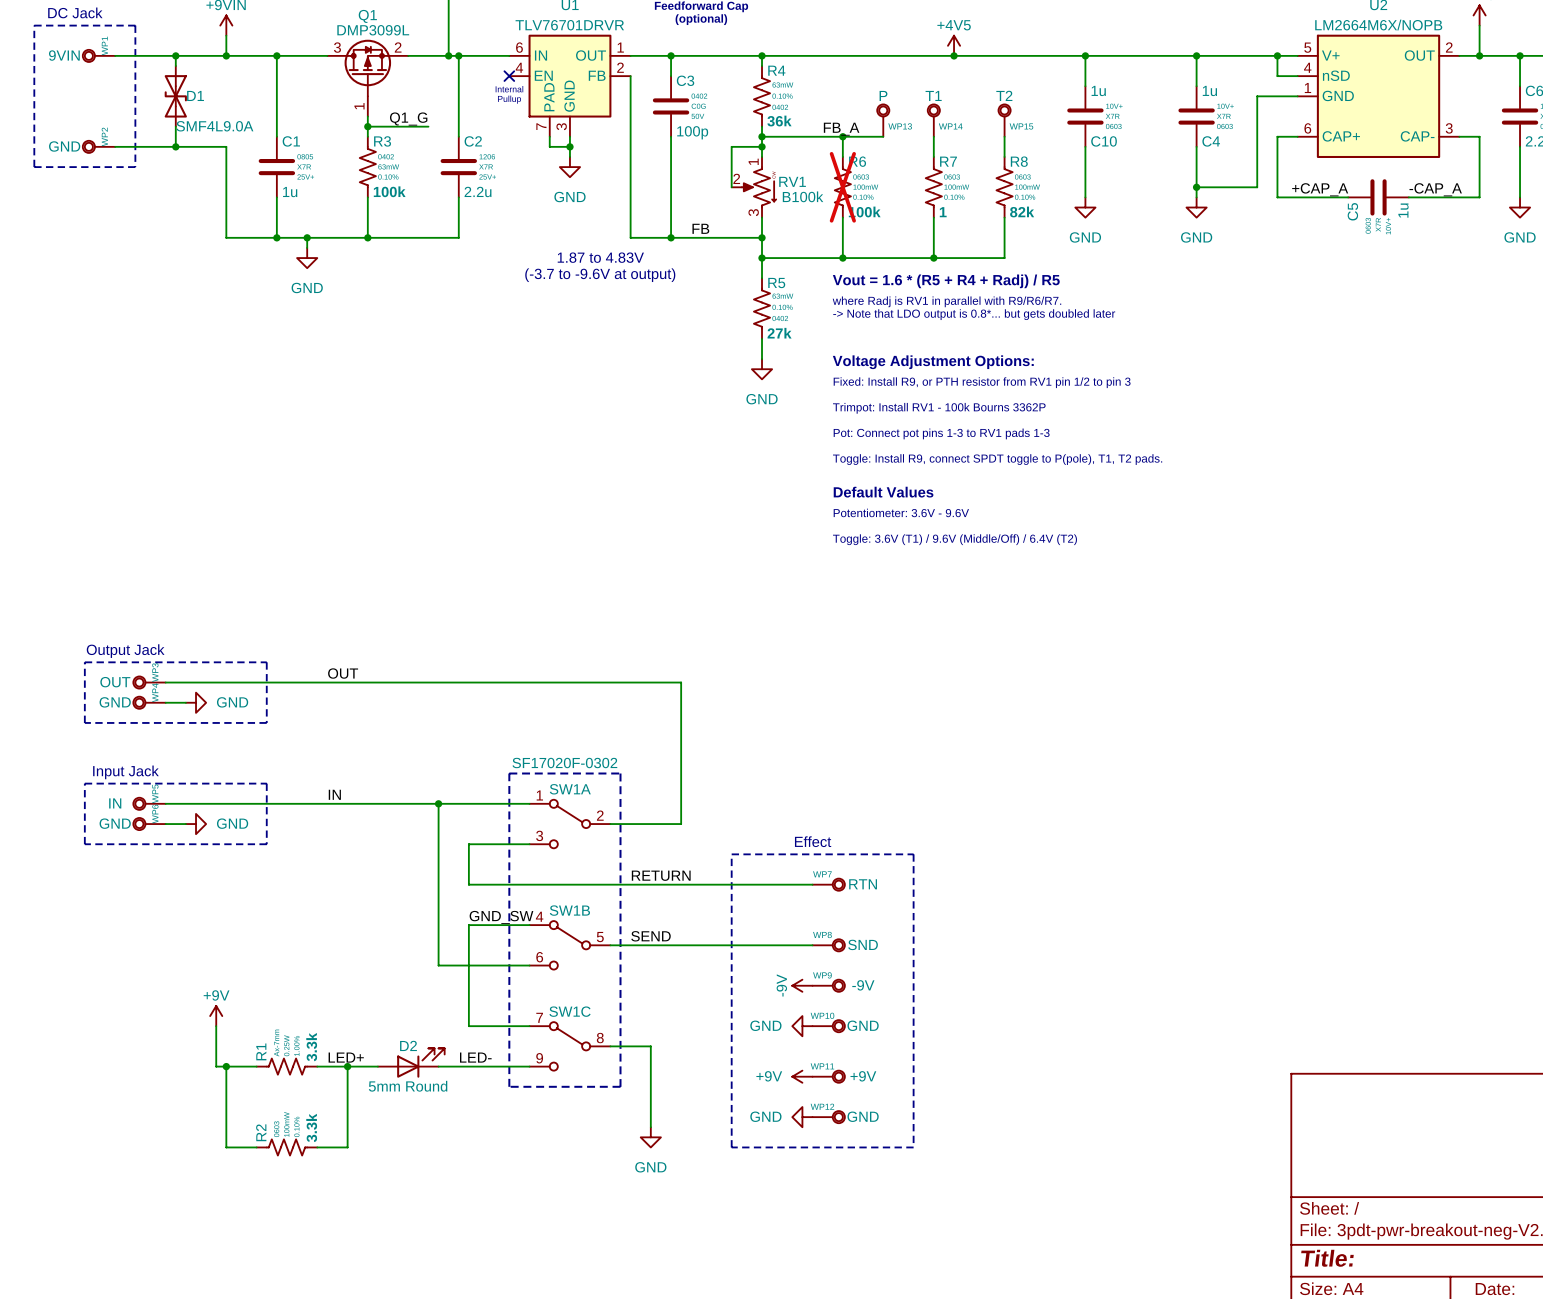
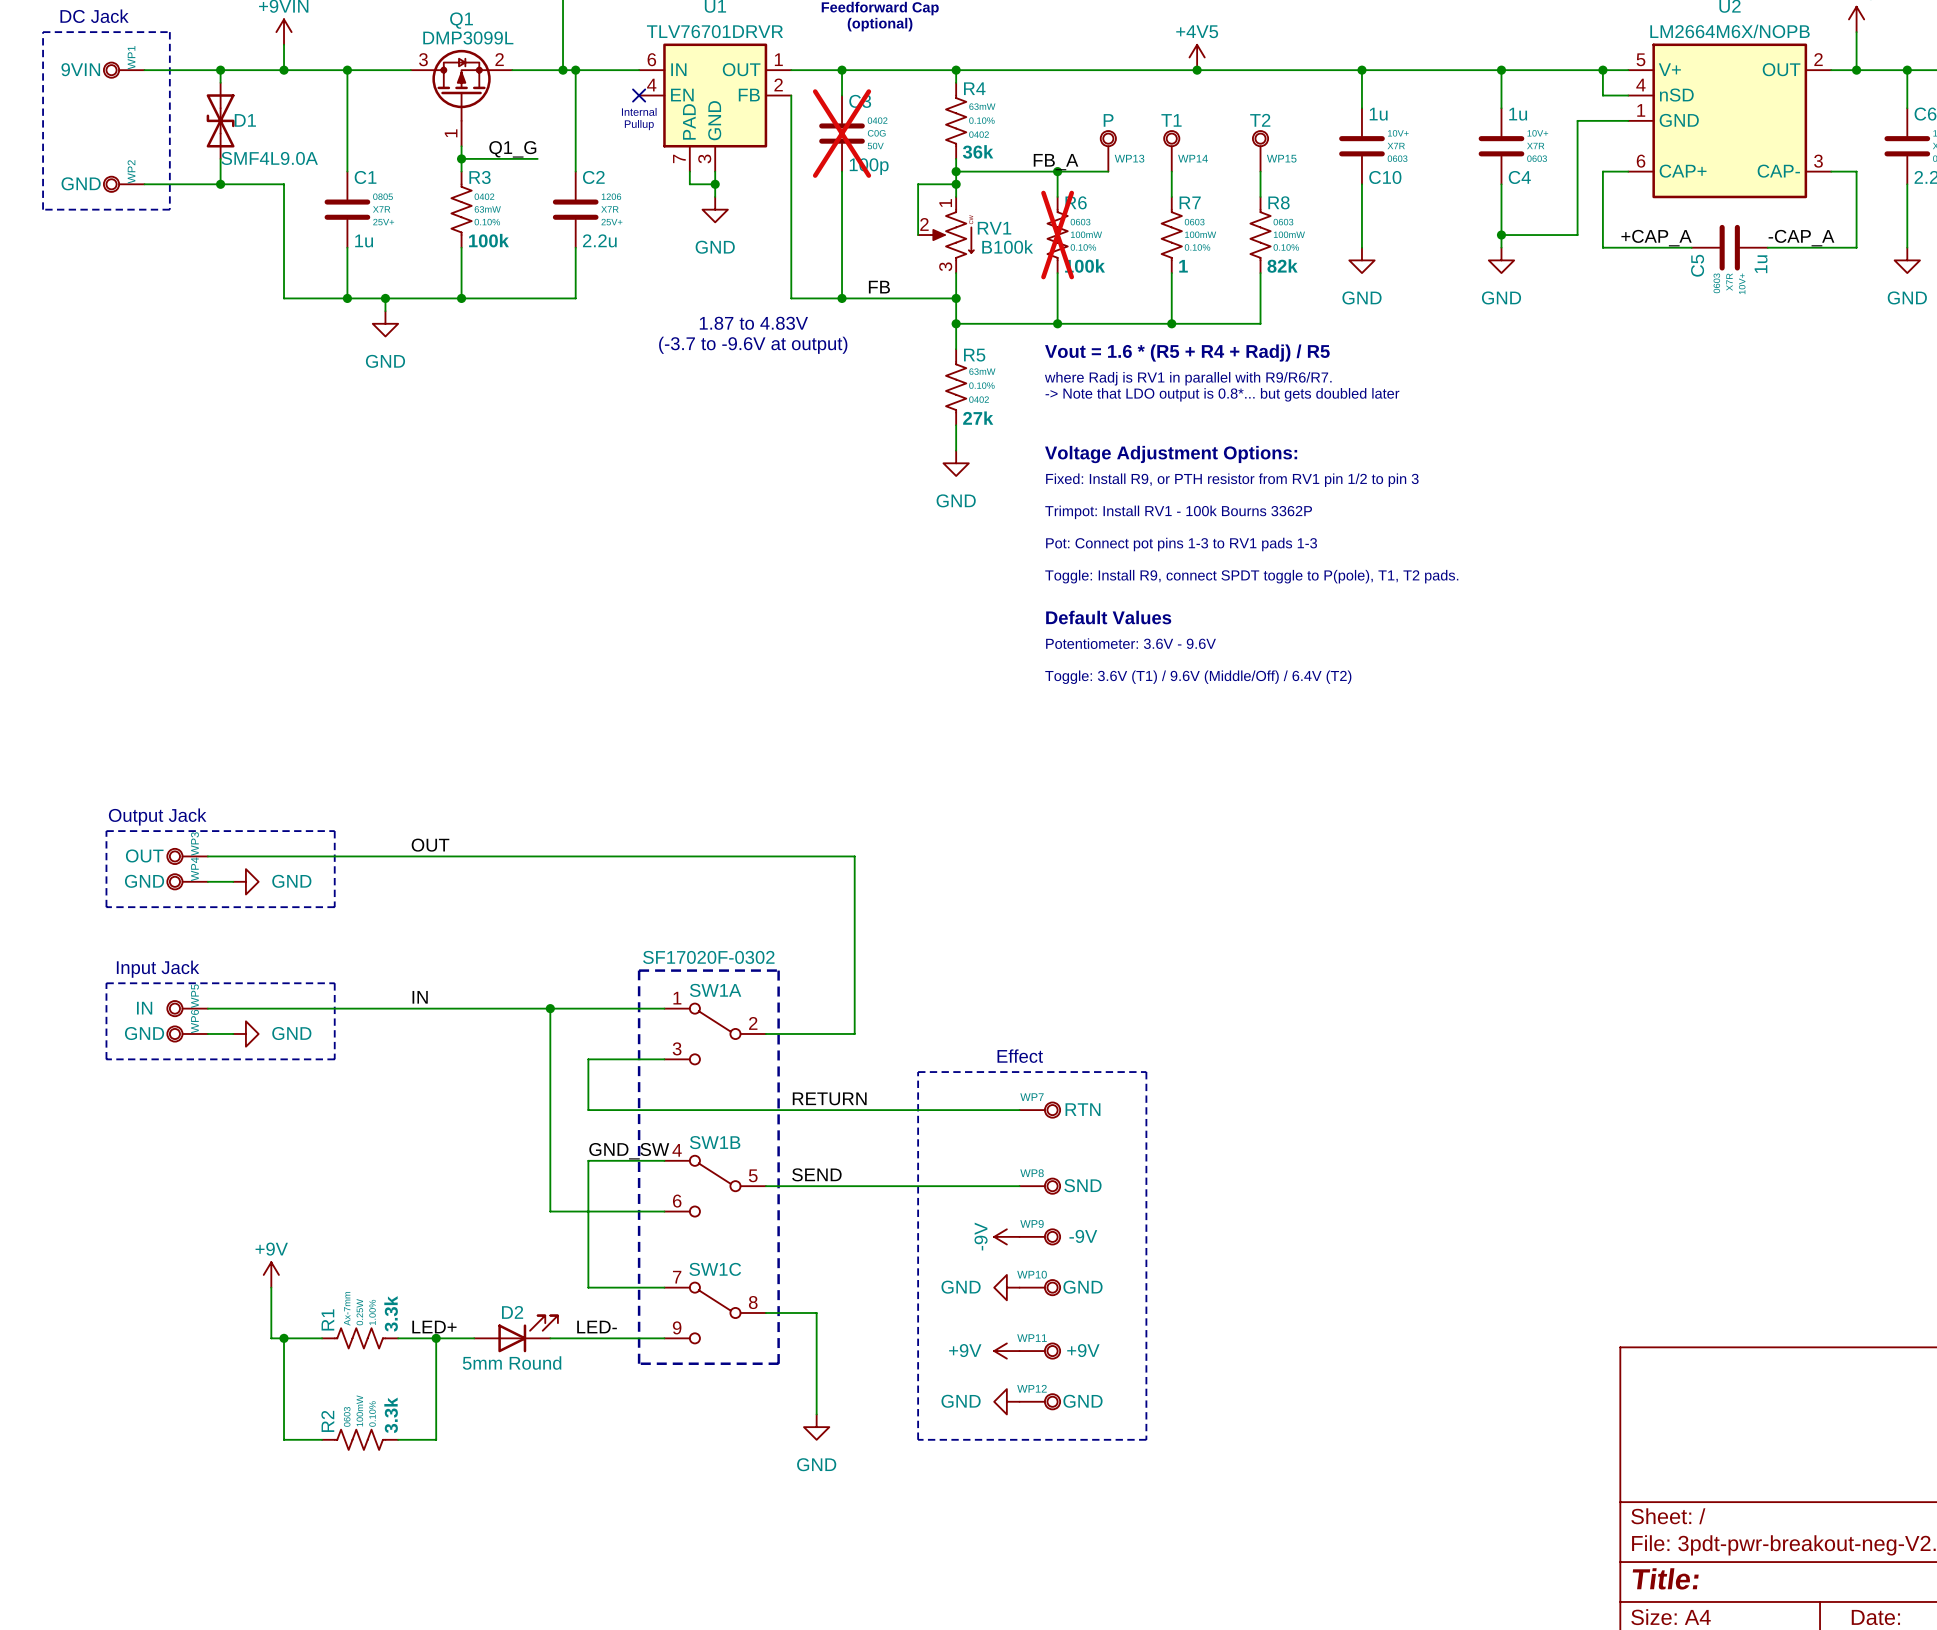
C3 do-not-place cross: none -> (842, 133)

